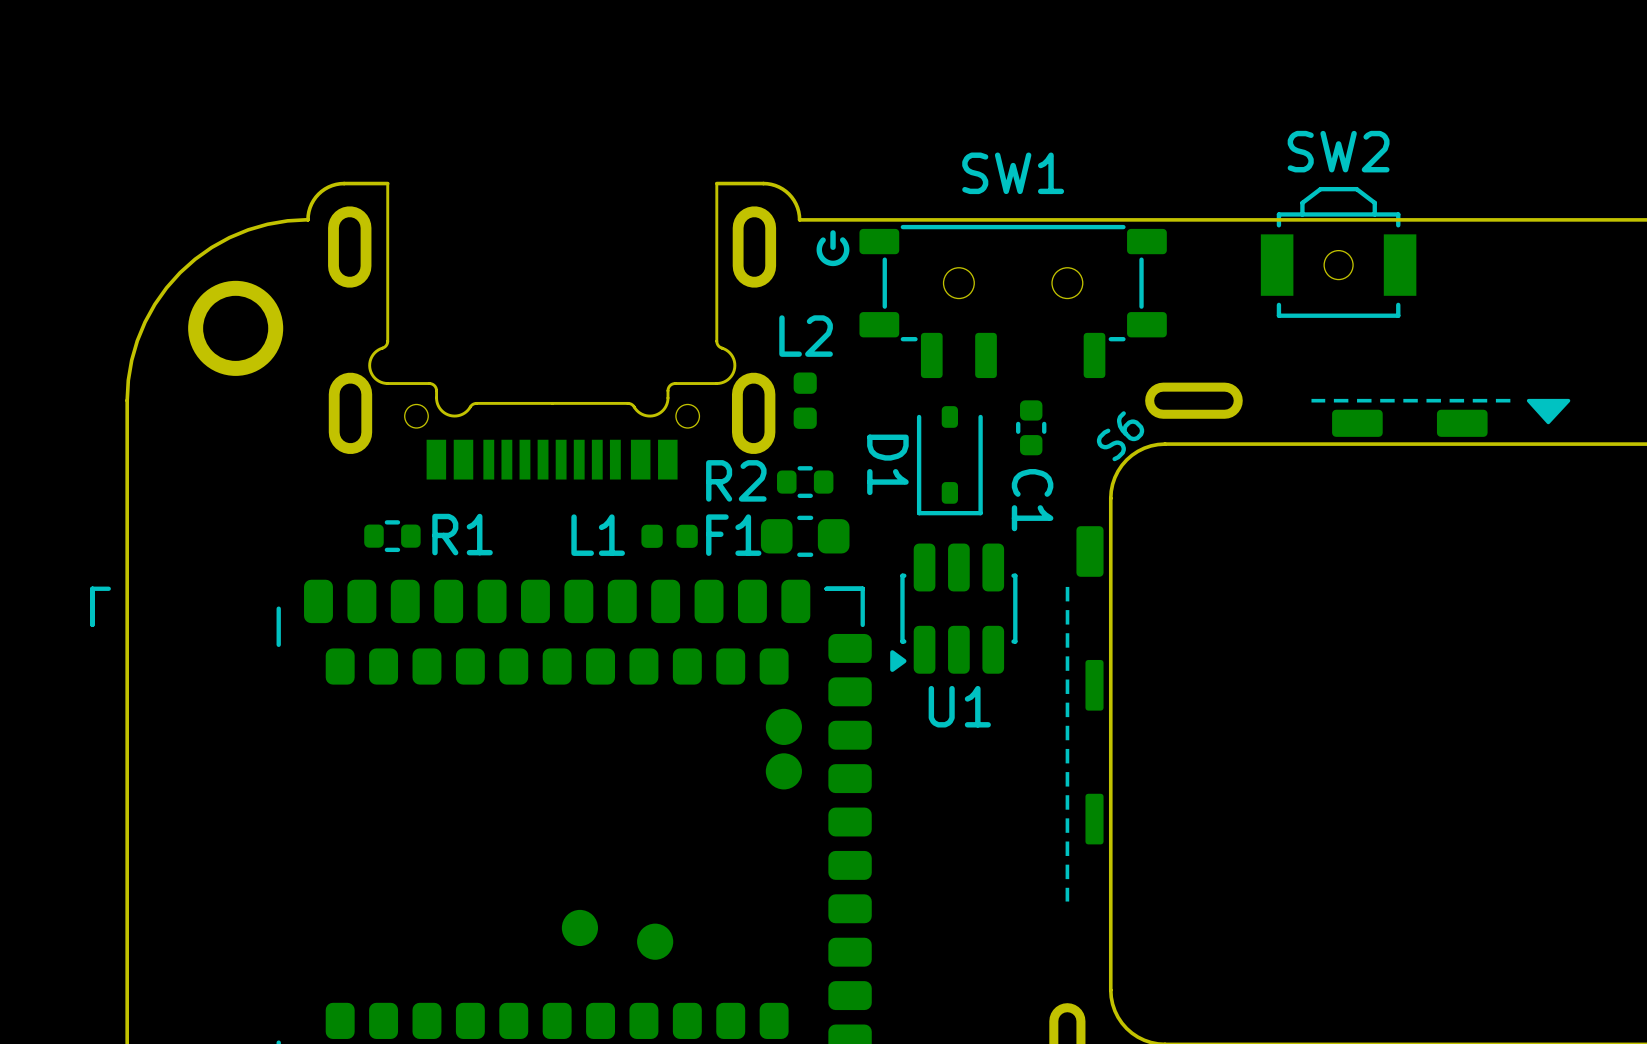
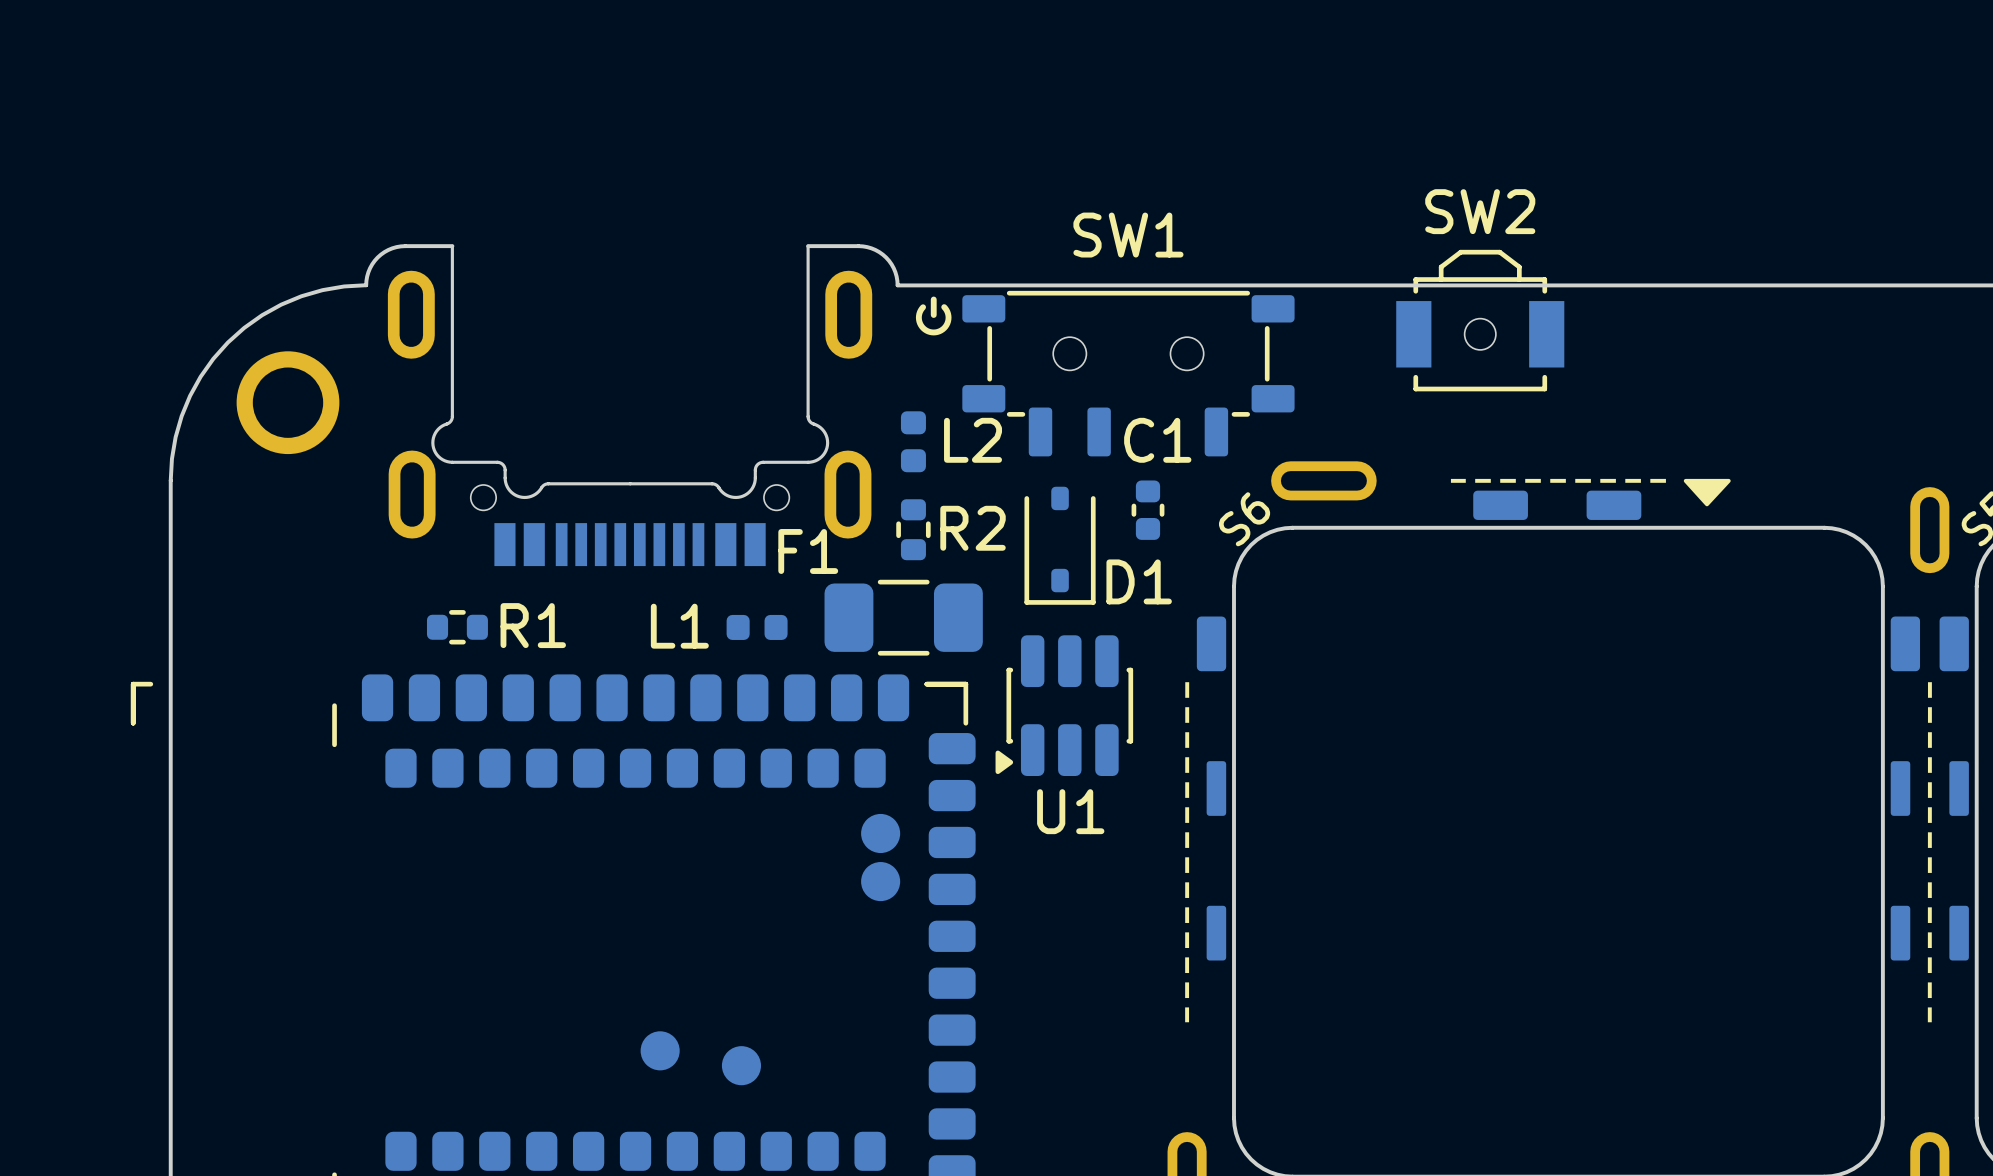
L2 name position: L2 (806, 336) -> L2 (973, 440)
L2 position: (805, 400) -> (913, 441)
D1 name rotation: 0° (887, 464) -> 90° counterclockwise (1139, 581)
D1 name position: D1 (887, 464) -> D1 (1139, 581)
R2 name position: R2 (736, 480) -> R2 (973, 528)
R2 rotation: 0° (805, 482) -> 90° clockwise (913, 529)
R2 position: (805, 482) -> (913, 529)
C1 name rotation: 0° (1032, 500) -> 90° counterclockwise (1157, 440)
C1 name position: C1 (1032, 500) -> C1 (1157, 440)
F1 footprint: [760, 515, 850, 557] -> [824, 579, 983, 656]
F1 name position: F1 (733, 535) -> F1 (808, 551)

